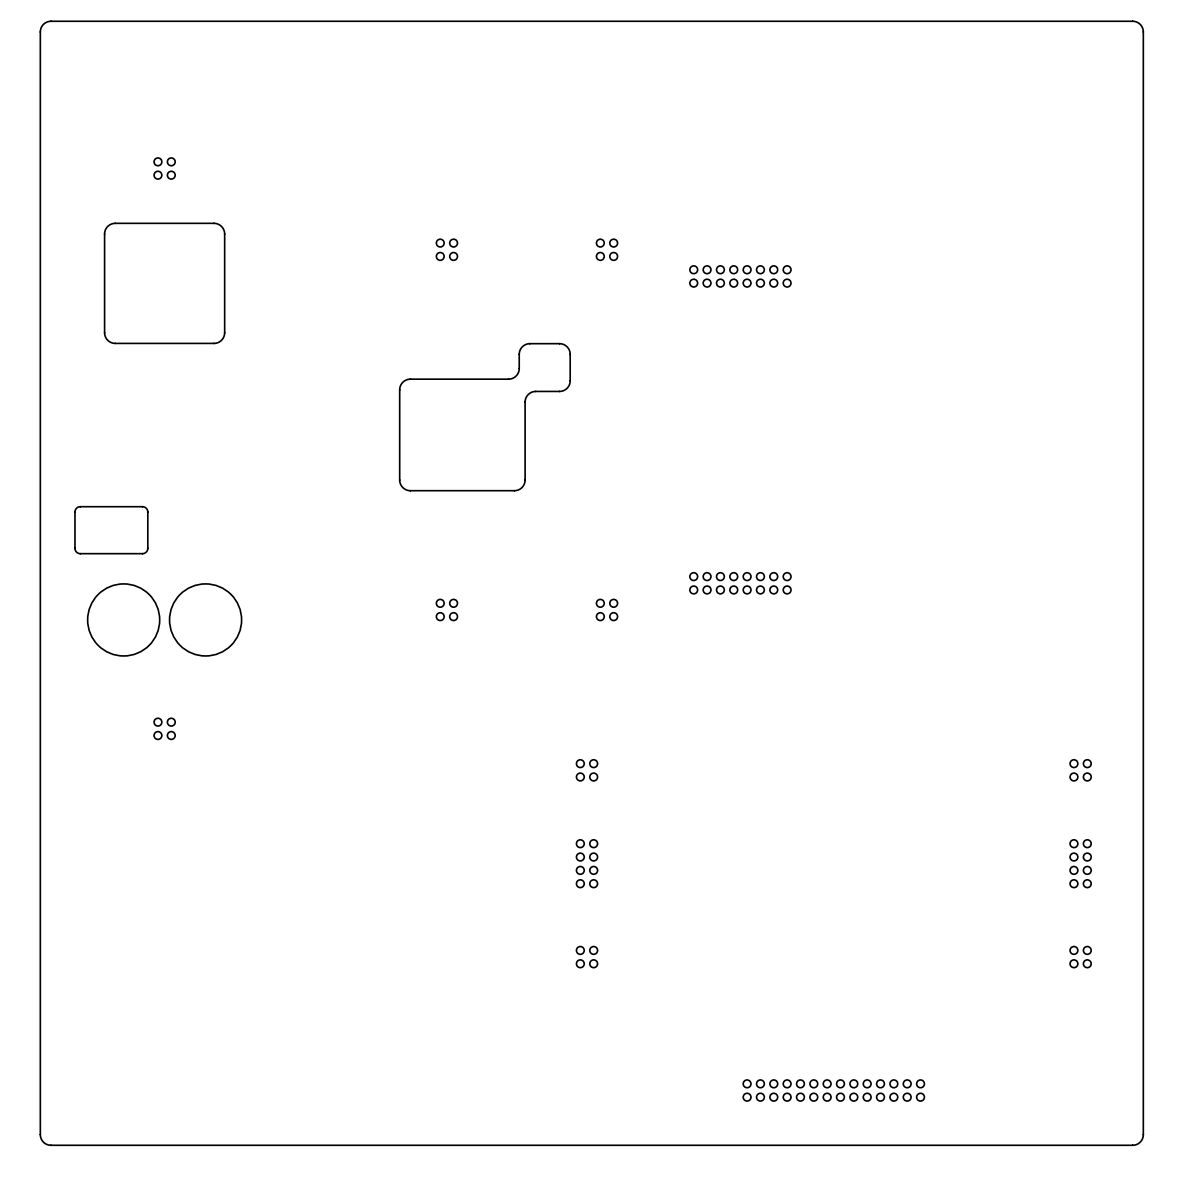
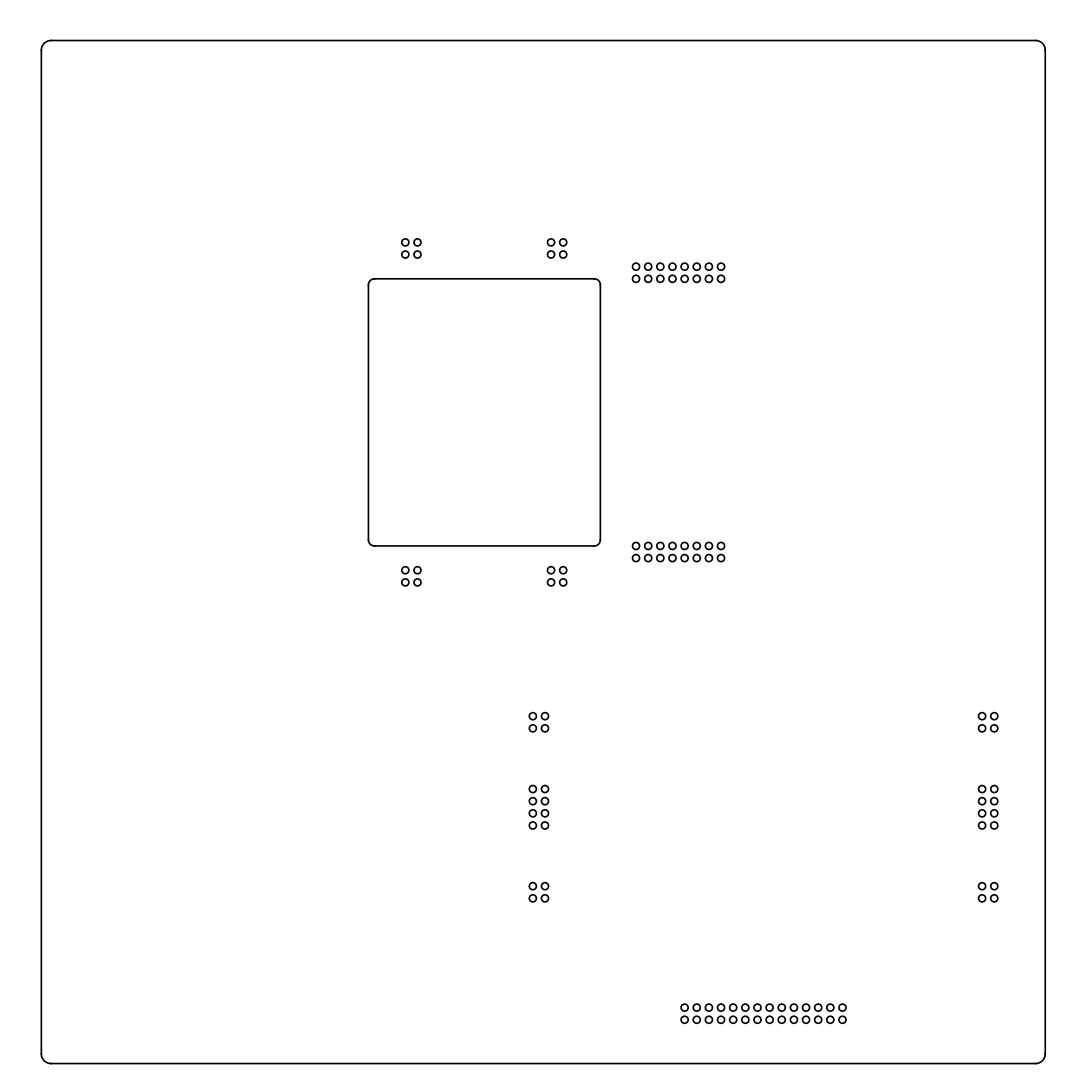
part: (164, 168) -> none
drawing: [74, 223, 242, 657] -> none
drawing: none -> [368, 278, 601, 547]
drawing: [399, 343, 571, 491] -> none
part: (164, 728) -> none

